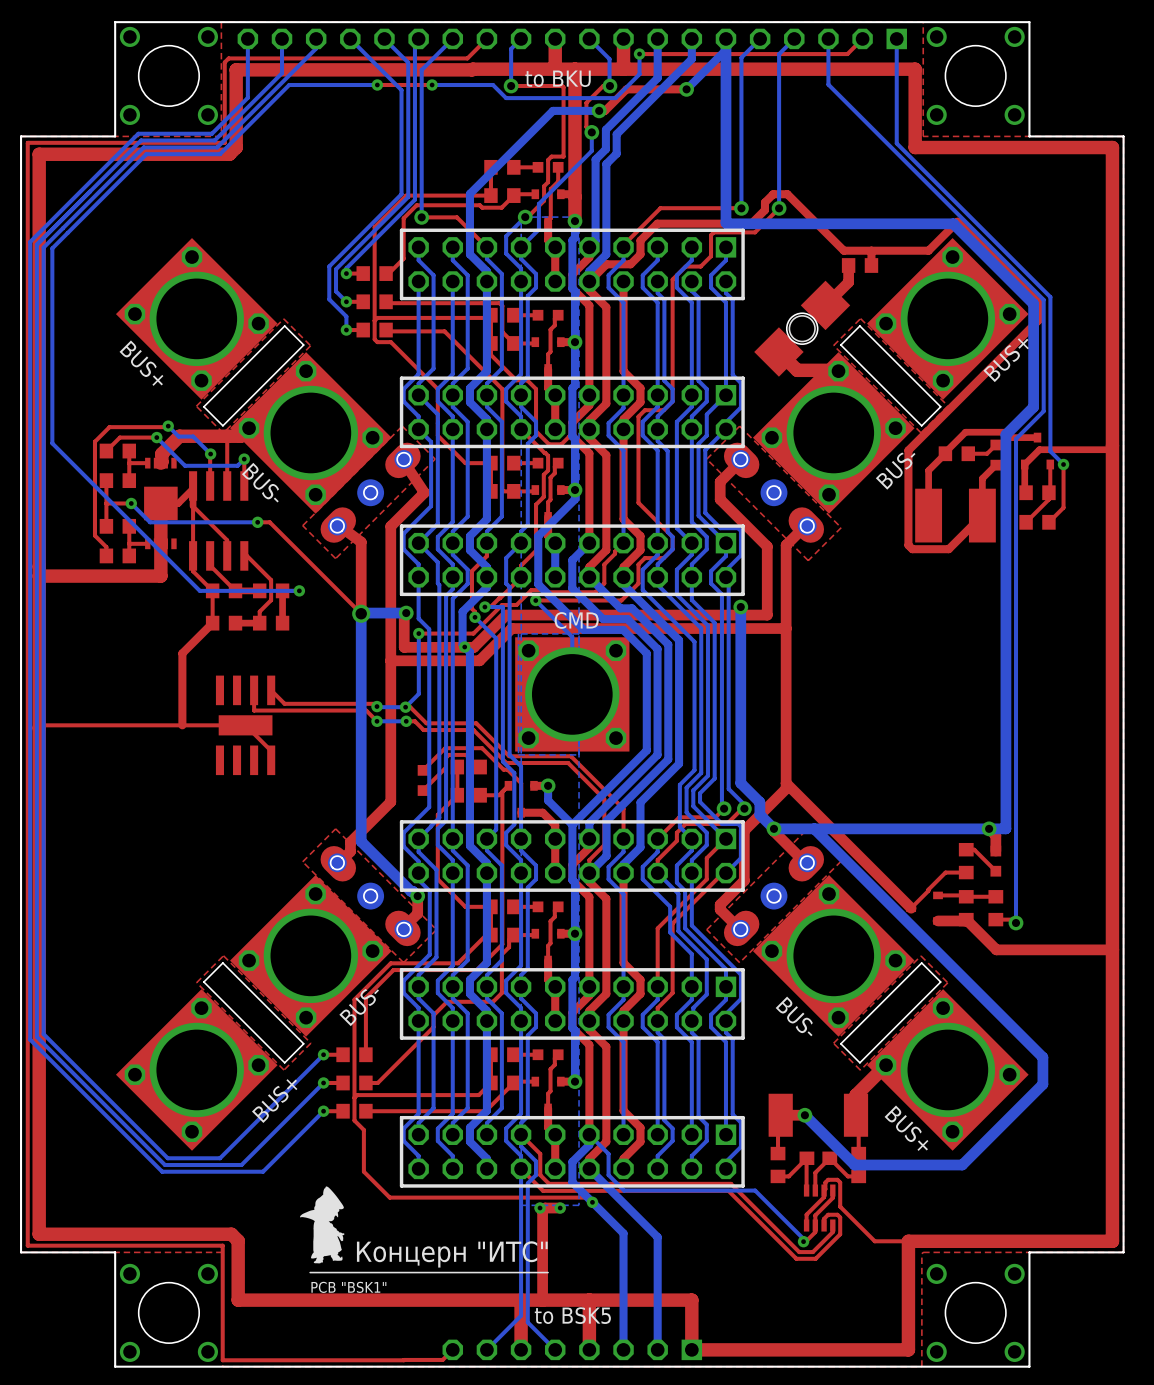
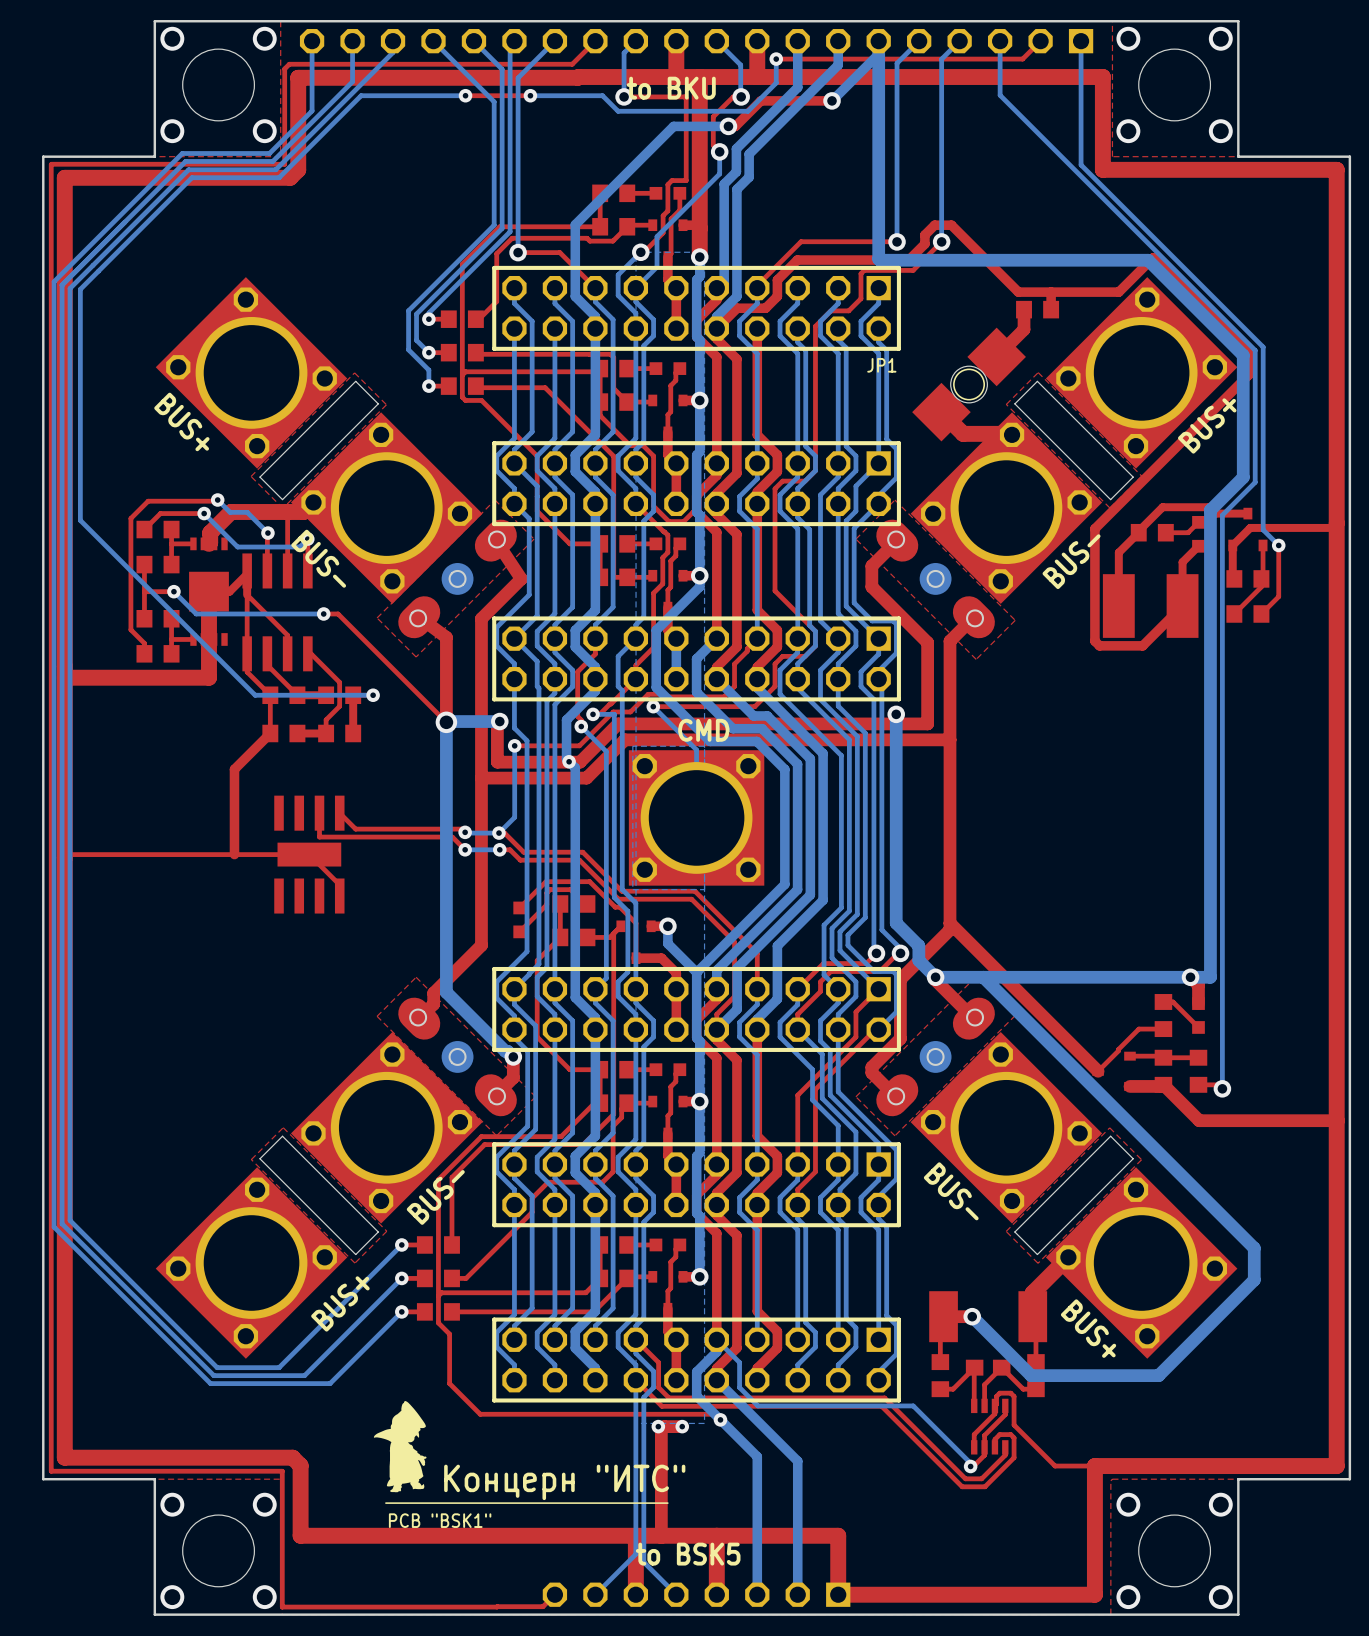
JP1 name: none -> JP1 (881, 365)
part footprint: [320, 442, 421, 543] -> [398, 519, 517, 639]
part footprint: [723, 442, 825, 543] -> [876, 519, 995, 639]
part footprint: [320, 846, 421, 947] -> [398, 997, 517, 1117]
part footprint: [723, 846, 825, 947] -> [876, 997, 995, 1117]

